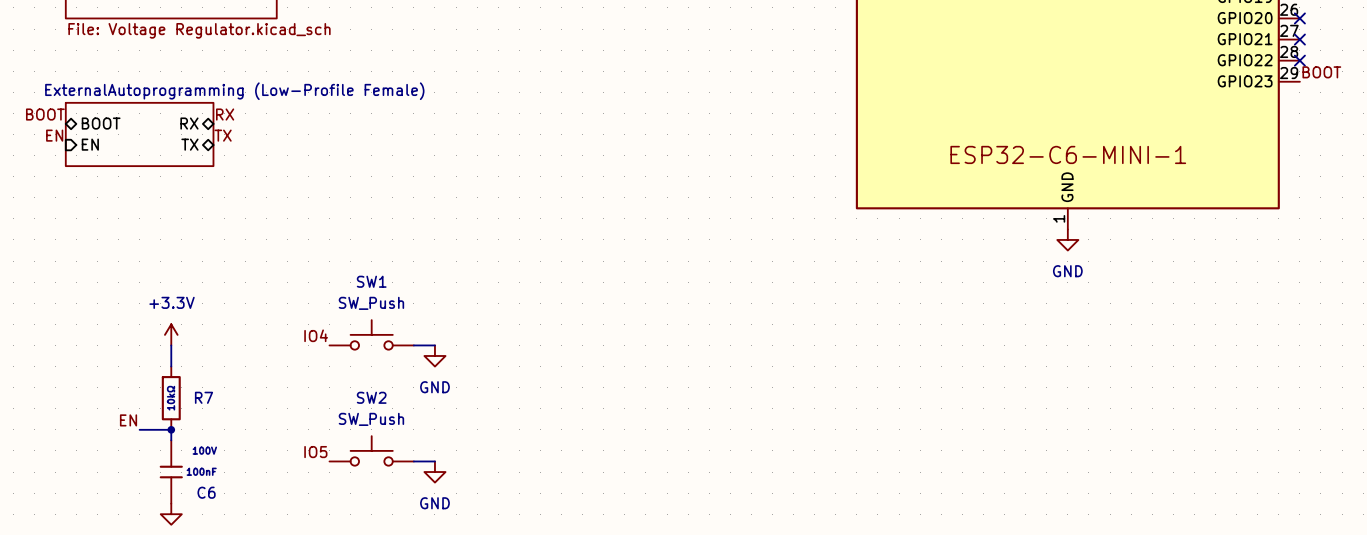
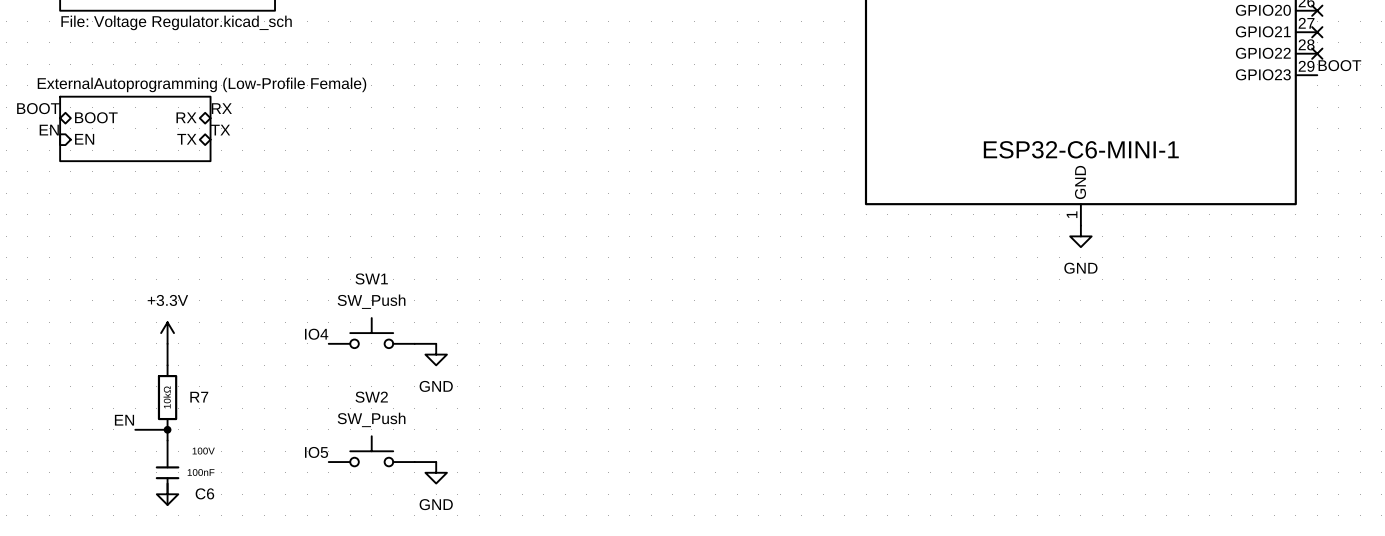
power symbol position: (171, 514) -> (167, 494)

